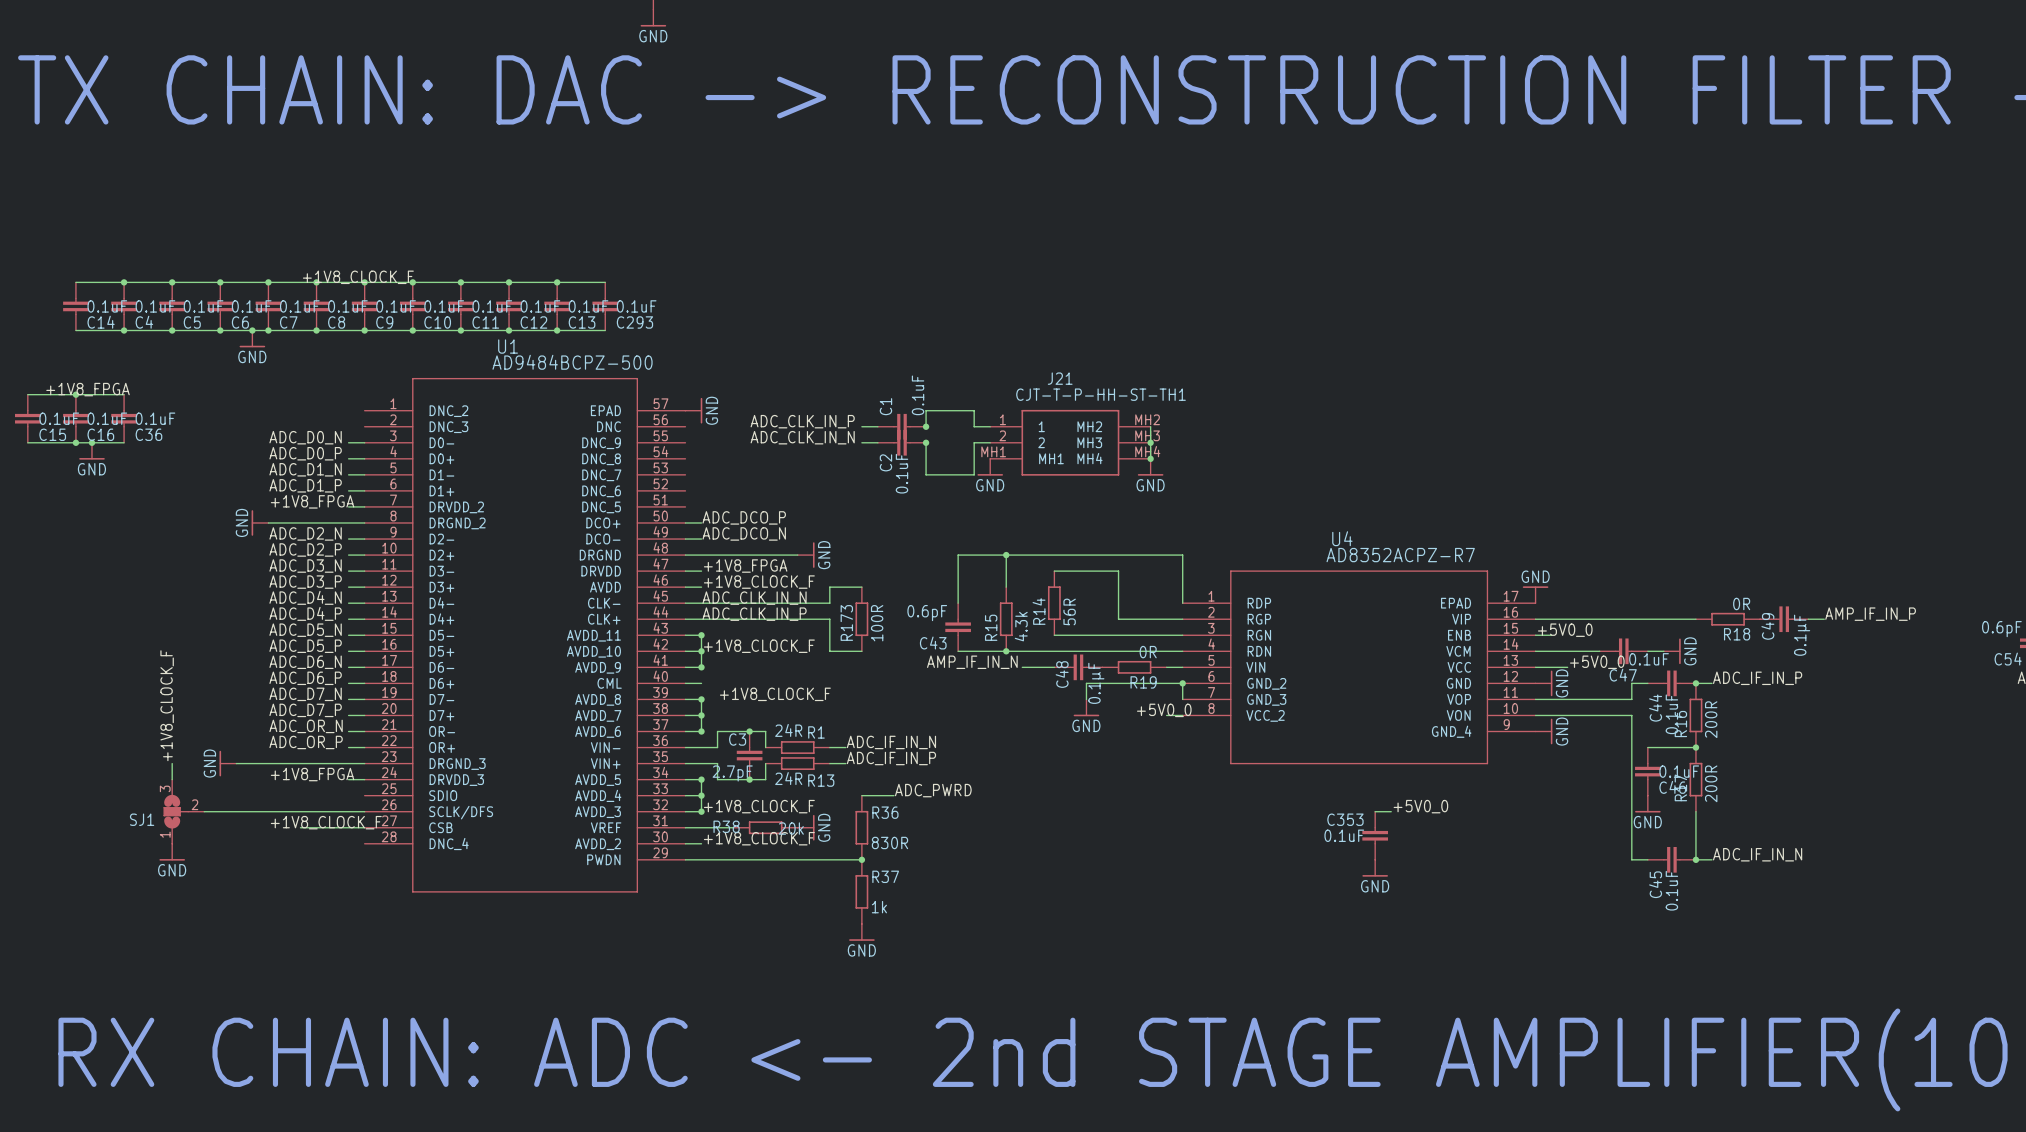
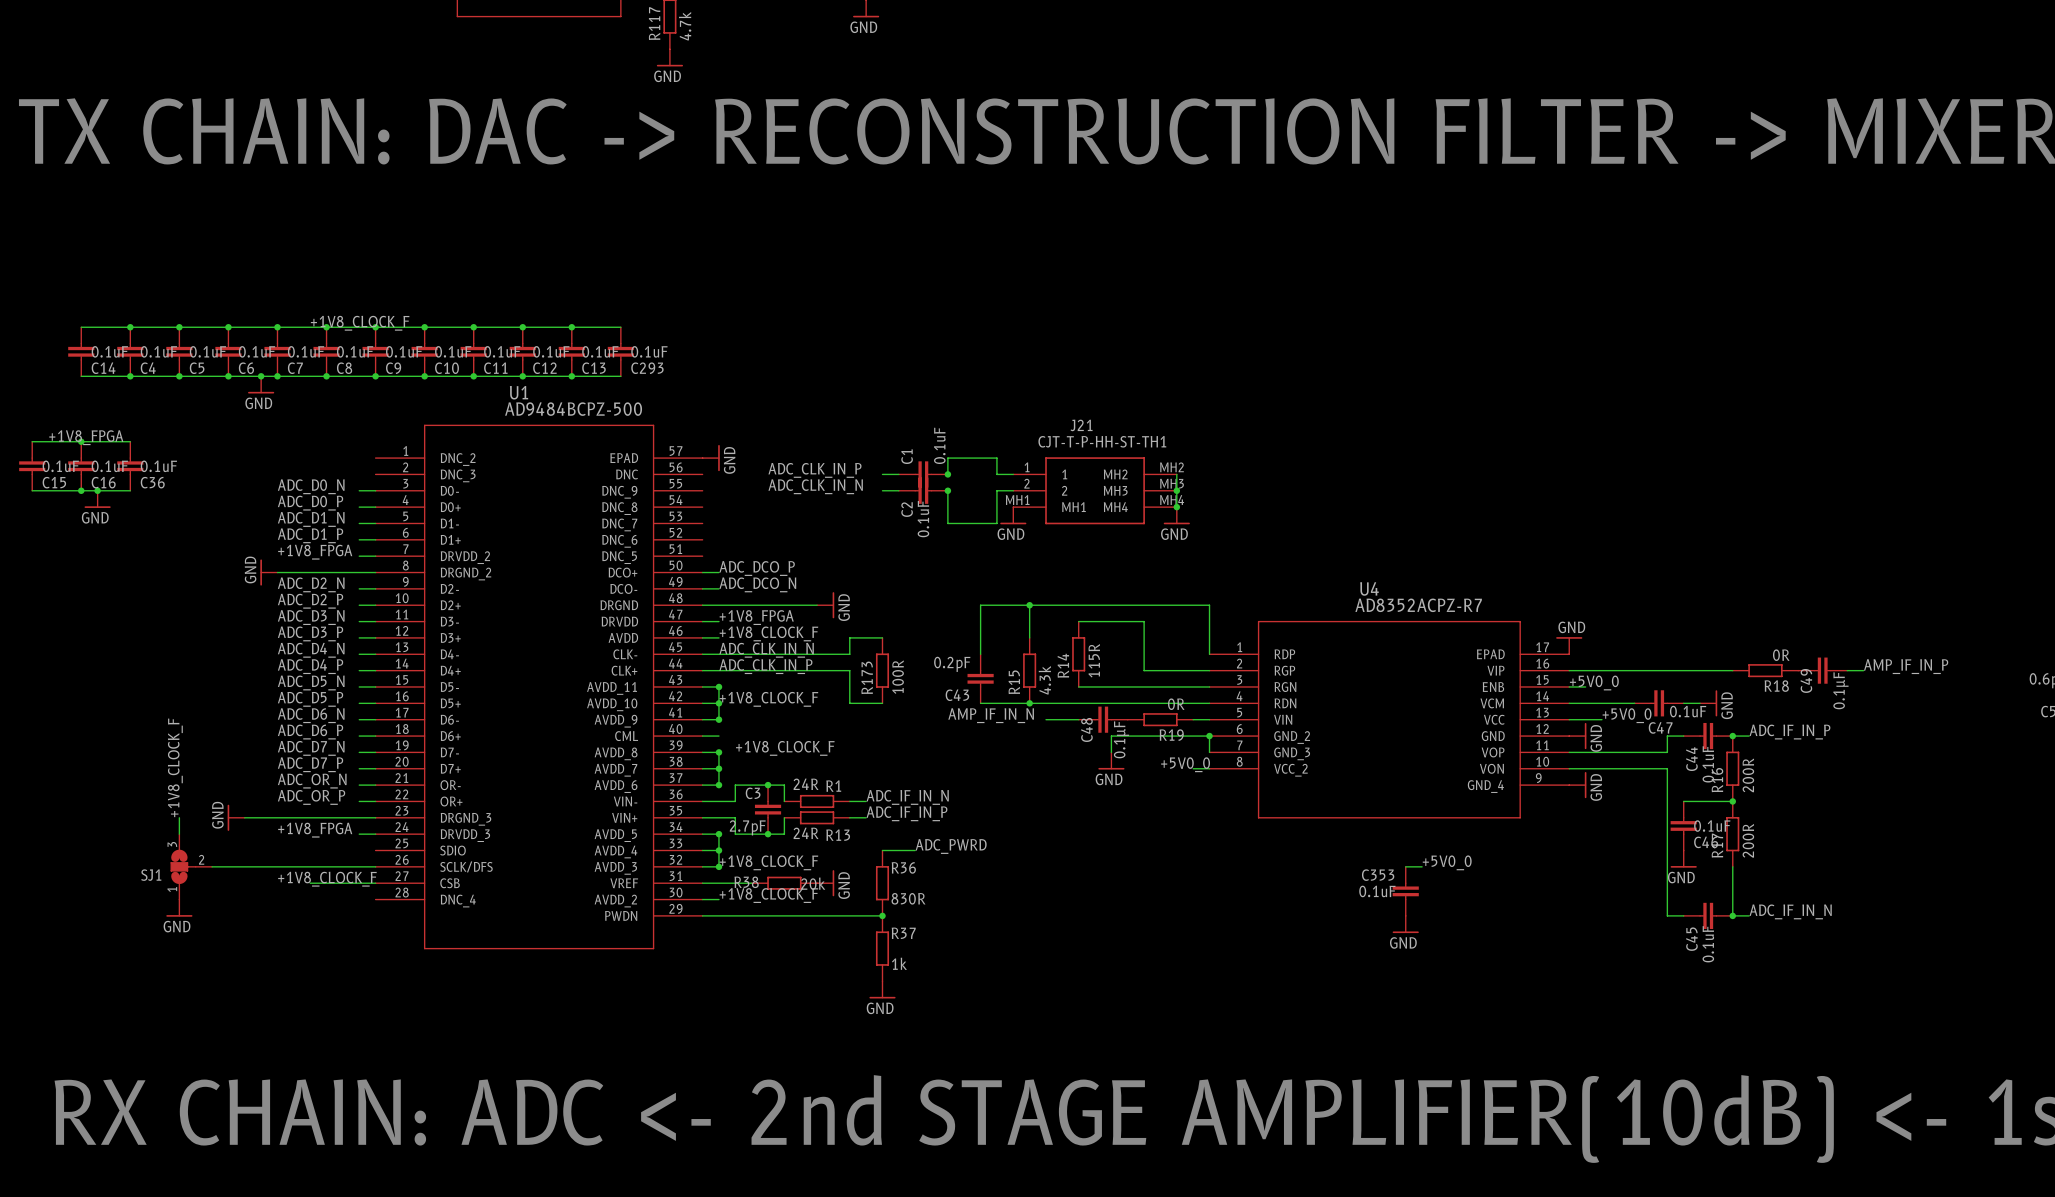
R14 value: 56R (1069, 611) -> 115R (1094, 660)
C43 value: 0.6pF (927, 613) -> 0.2pF (952, 664)

